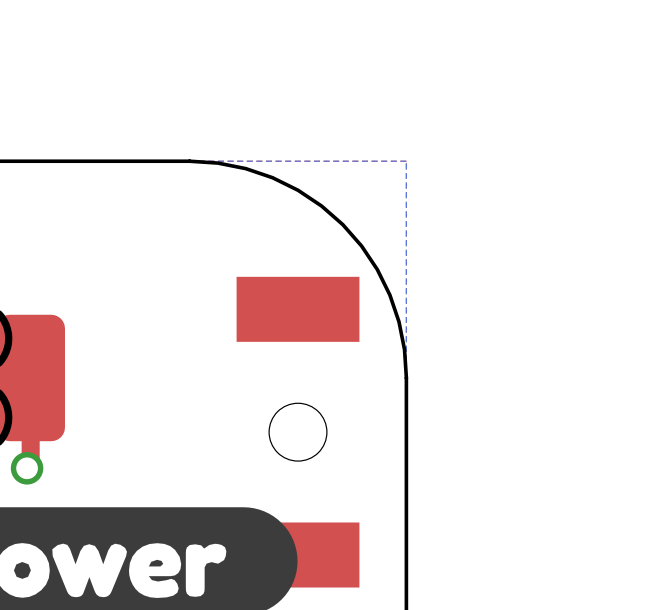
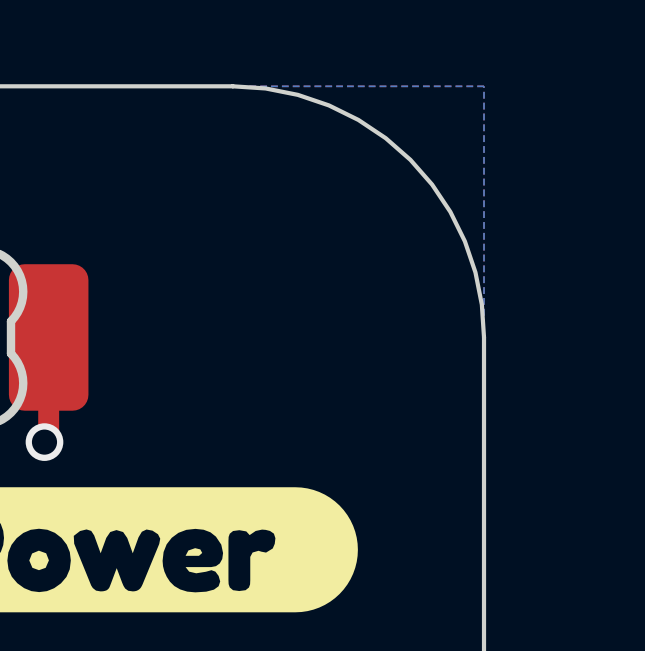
part: (298, 432) -> none

